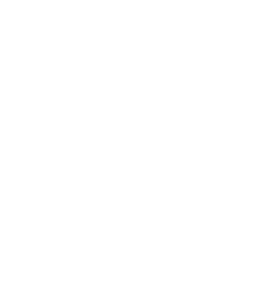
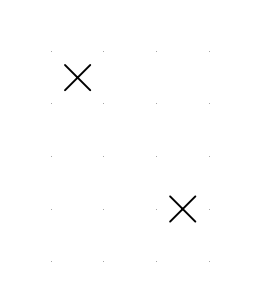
no-connect mark: none -> (77, 77)
no-connect mark: none -> (182, 209)

